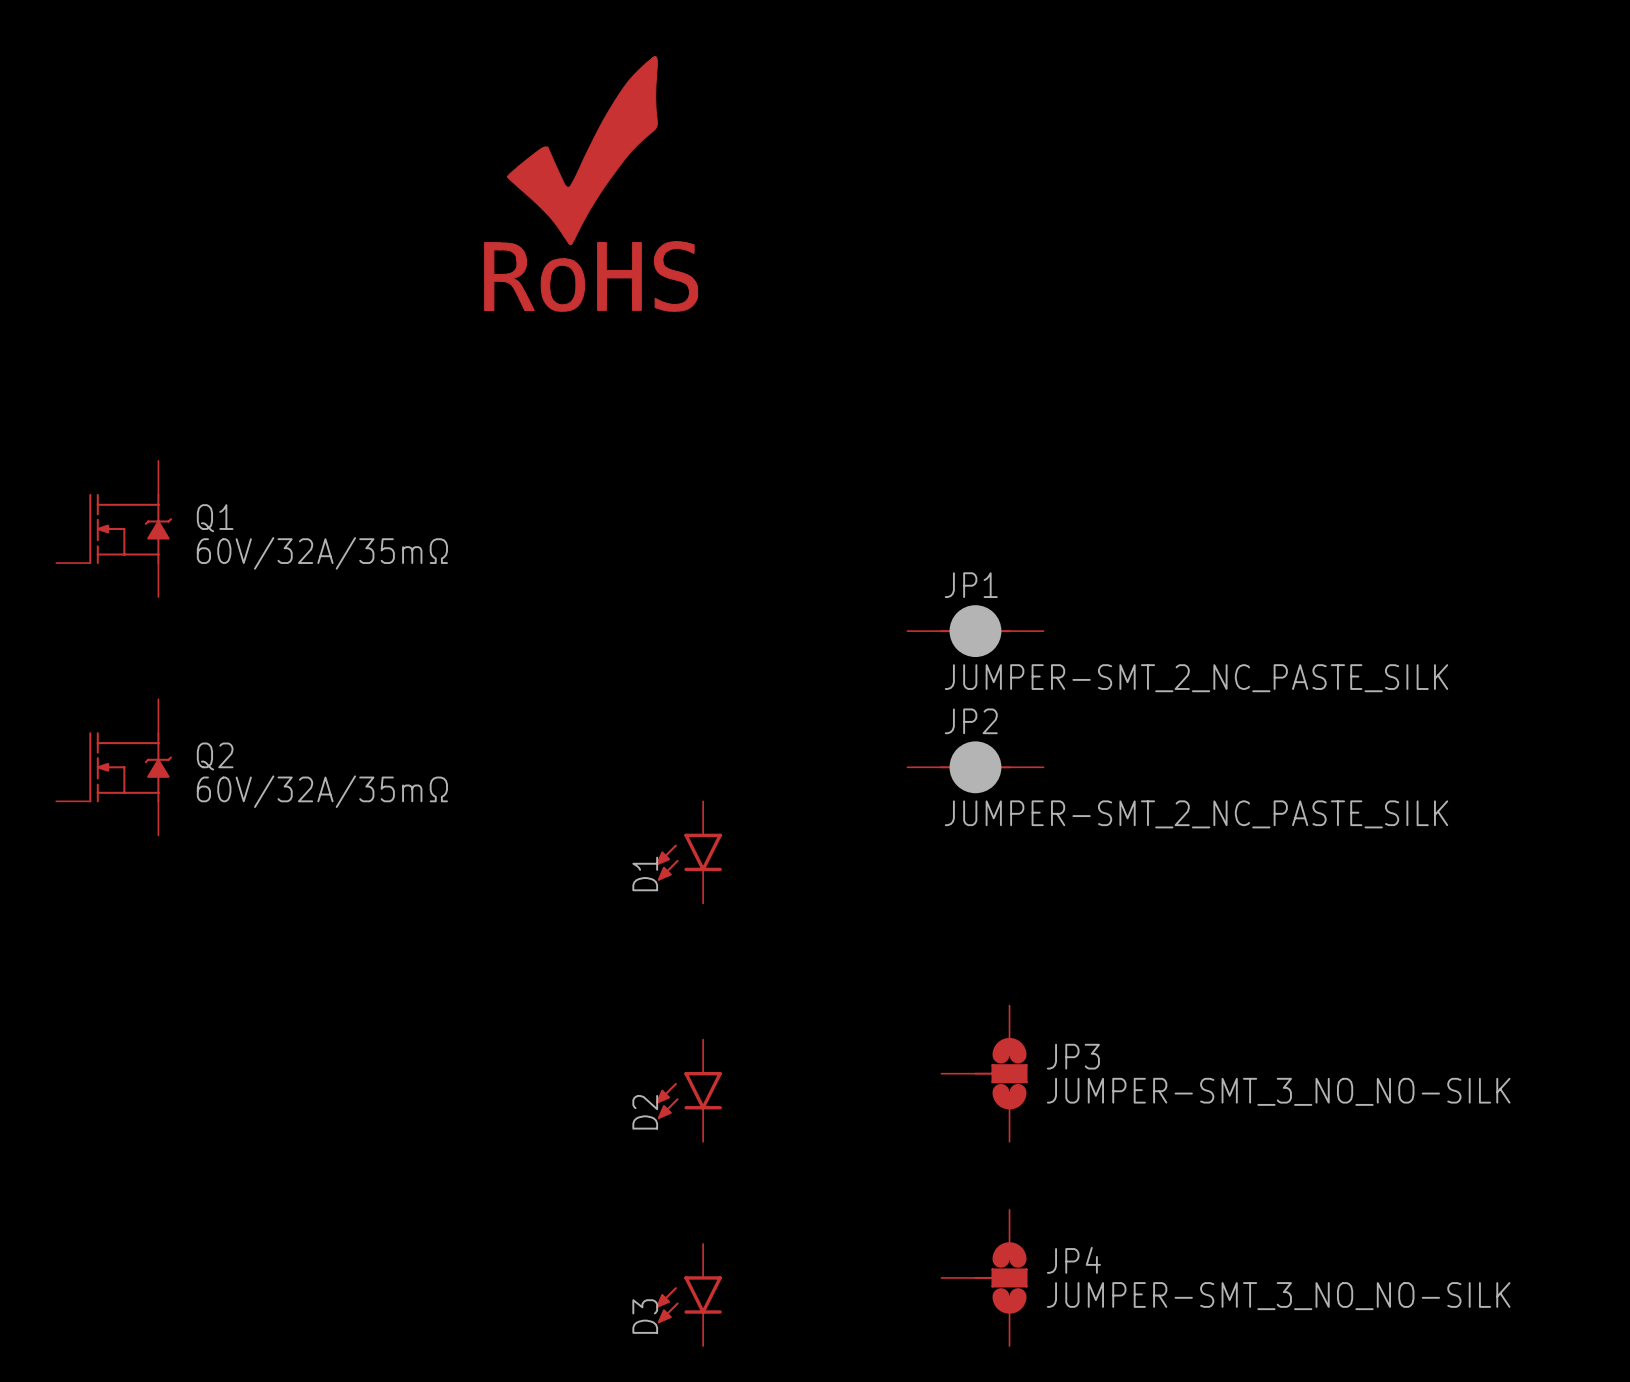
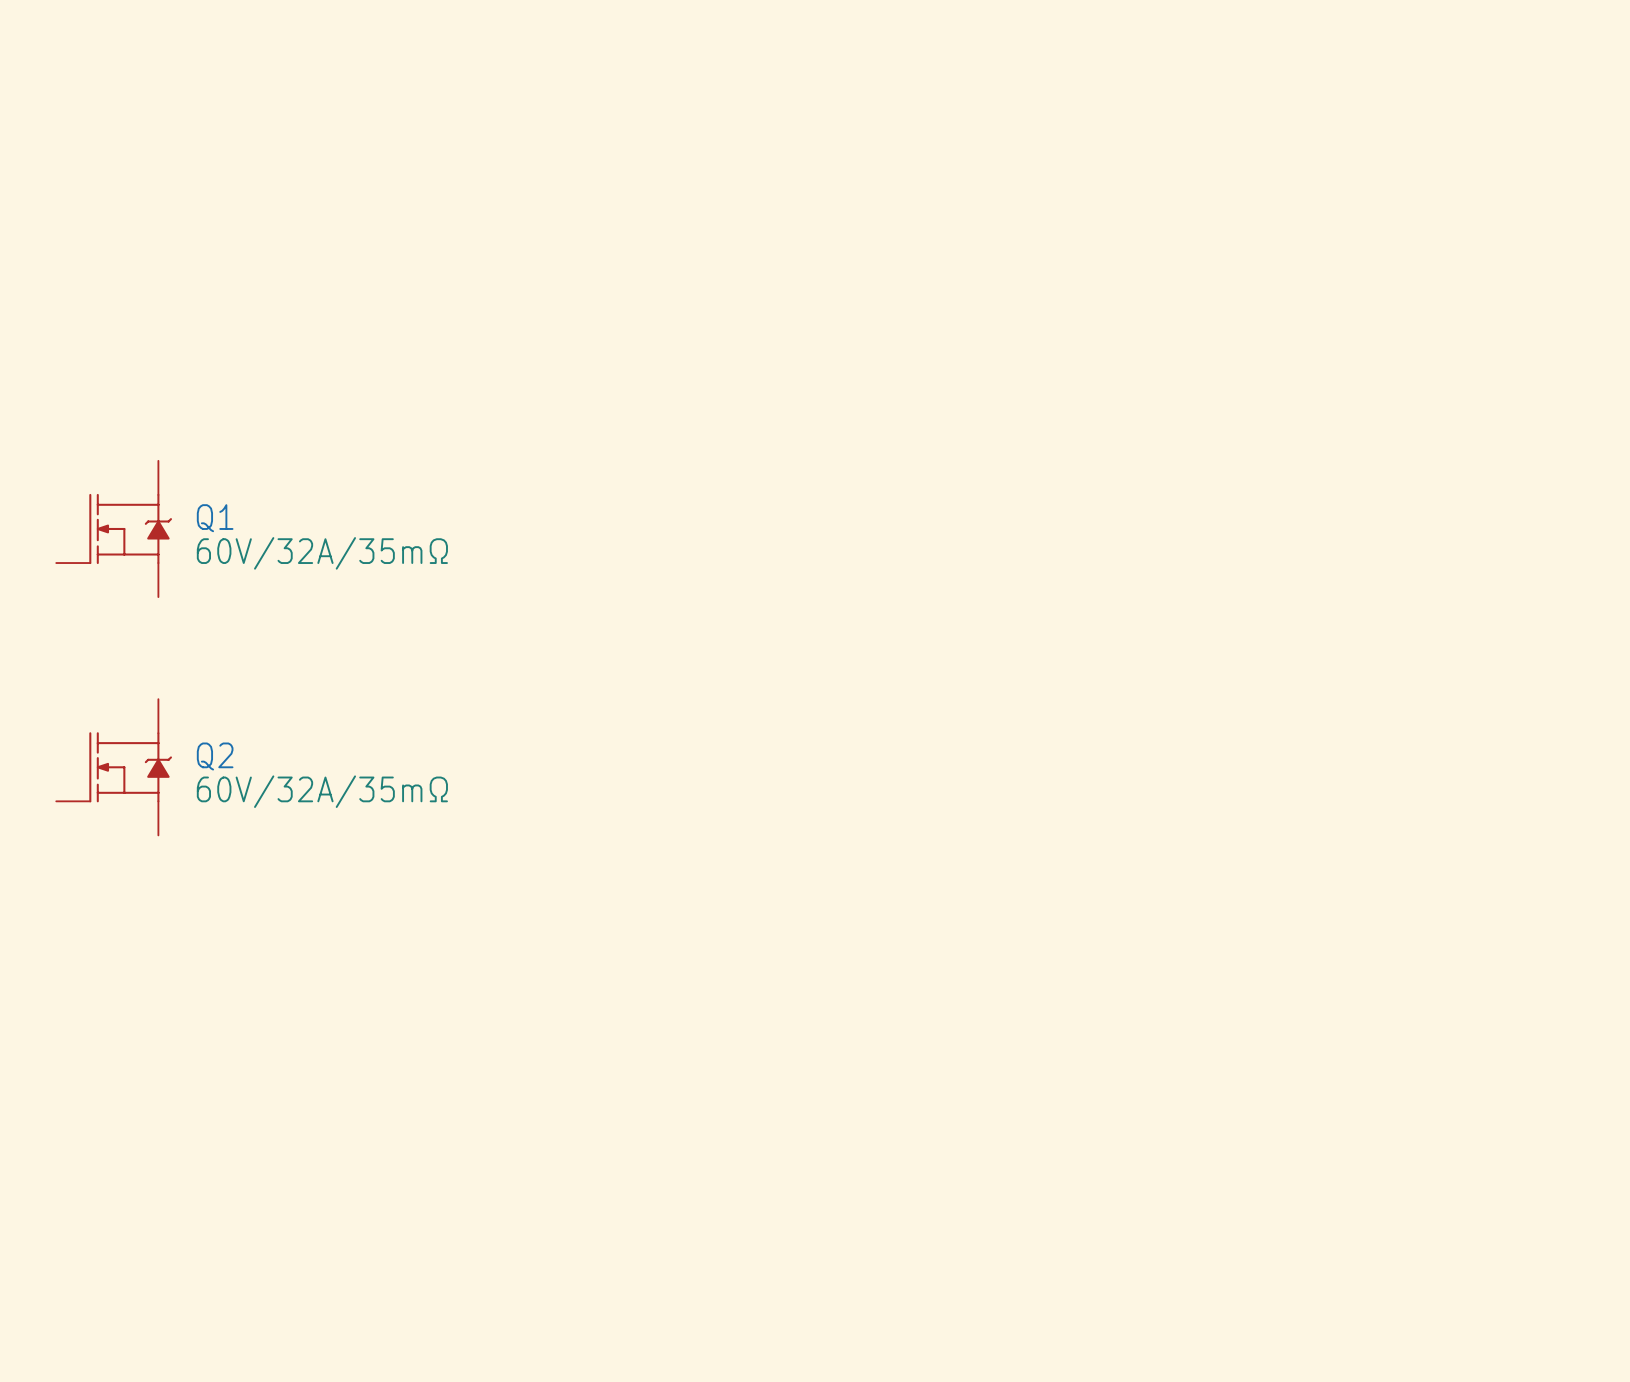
part: (591, 184) -> none
JP1: JUMPER-SMT_2_NC_PASTE_SILK (975, 631) -> none
JP2: JUMPER-SMT_2_NC_PASTE_SILK (975, 767) -> none
D1: (688, 852) -> none
JP3: JUMPER-SMT_3_NO_NO-SILK (984, 1073) -> none
D2: (688, 1090) -> none
JP4: JUMPER-SMT_3_NO_NO-SILK (984, 1277) -> none
D3: (688, 1294) -> none

